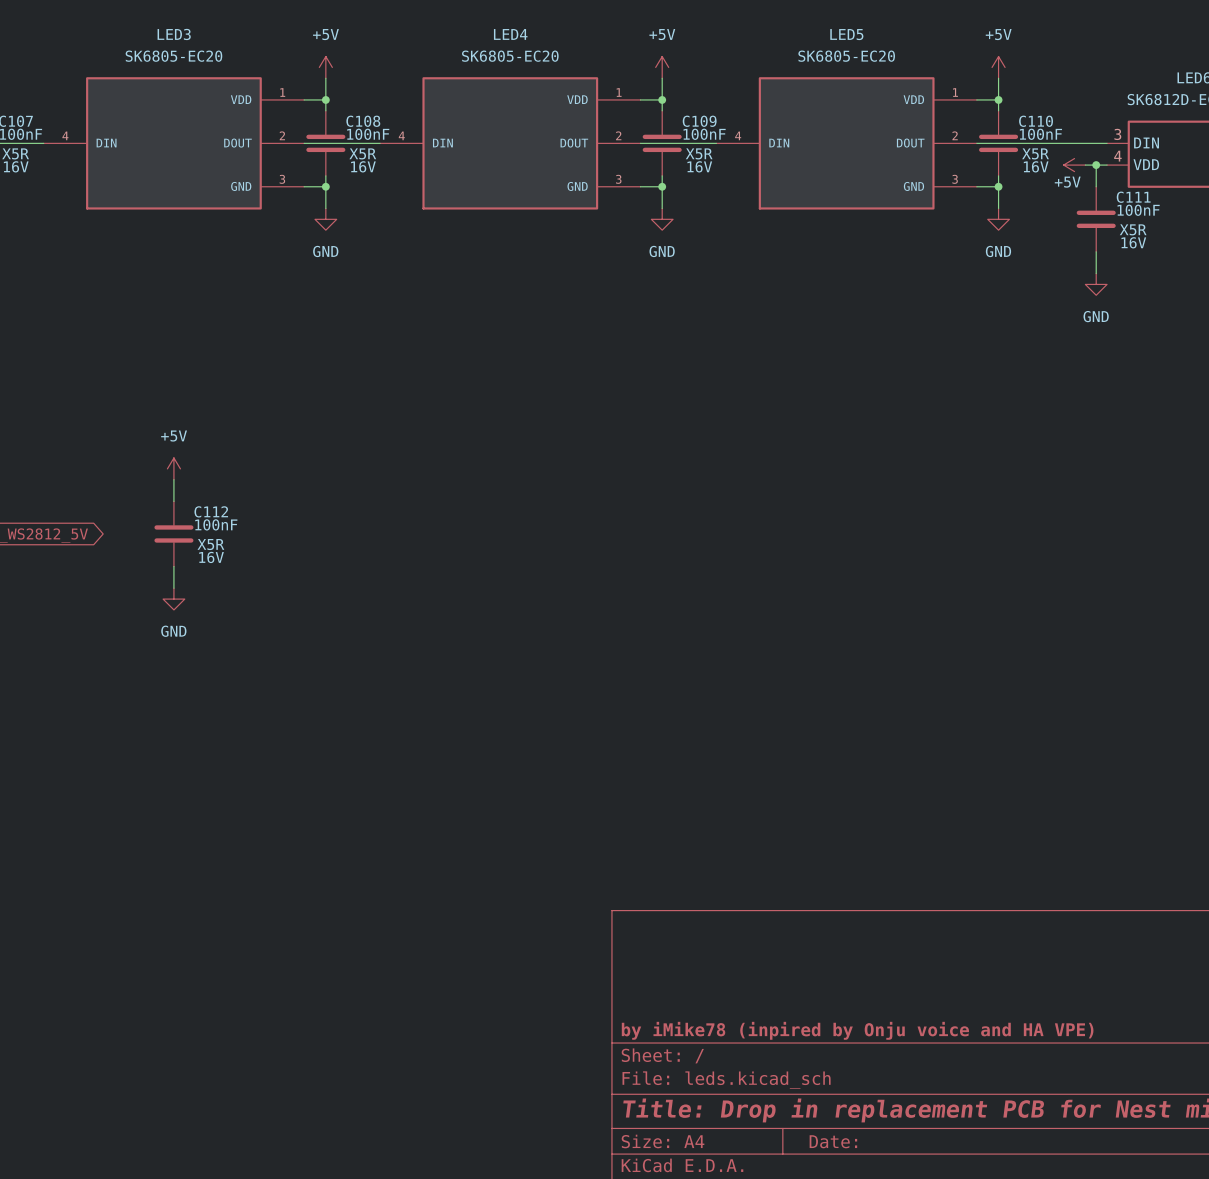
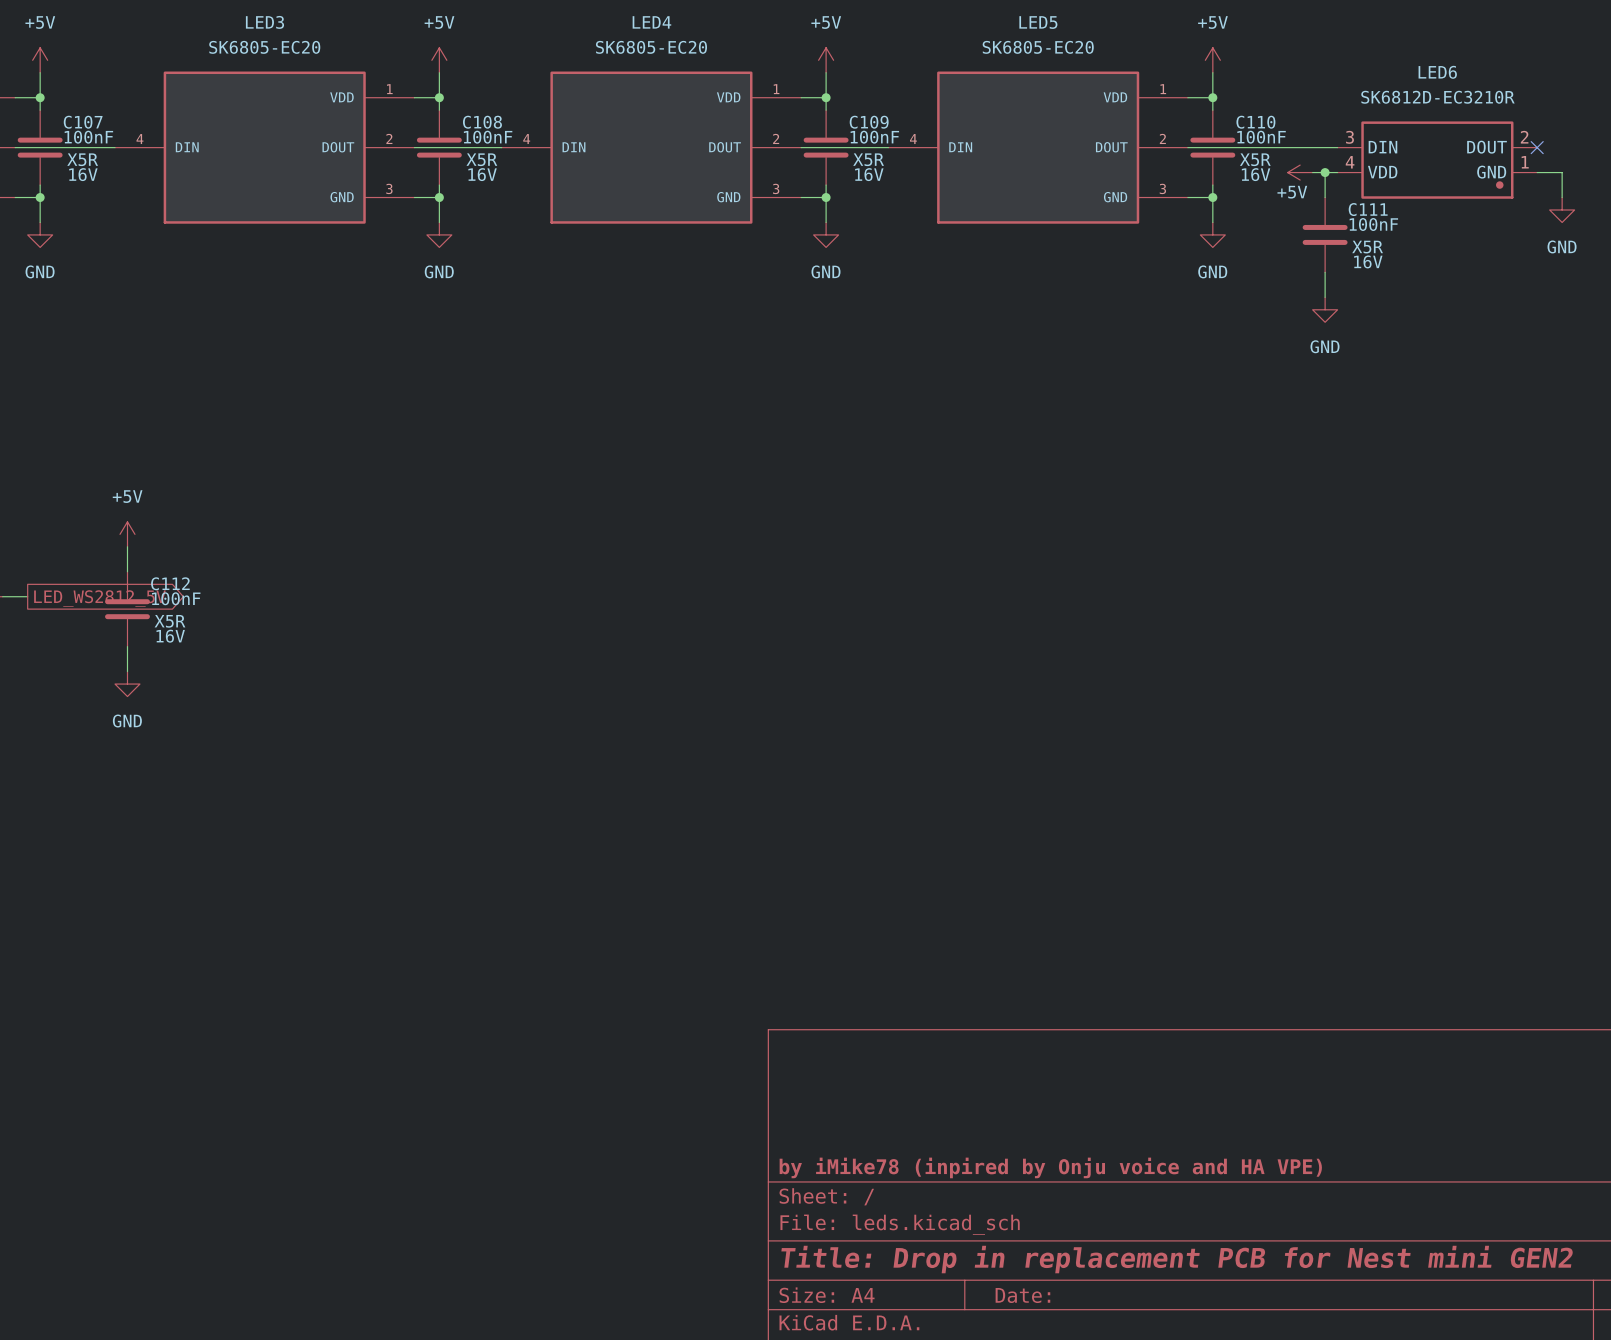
power symbol position: +5V (173, 468) -> +5V (127, 534)
wire: (173, 479) (173, 501) -> (127, 546) (127, 571)
C112 position: (173, 533) -> (127, 609)
wire: (173, 566) (173, 588) -> (127, 646) (127, 671)
power symbol position: GND (173, 599) -> GND (127, 684)

